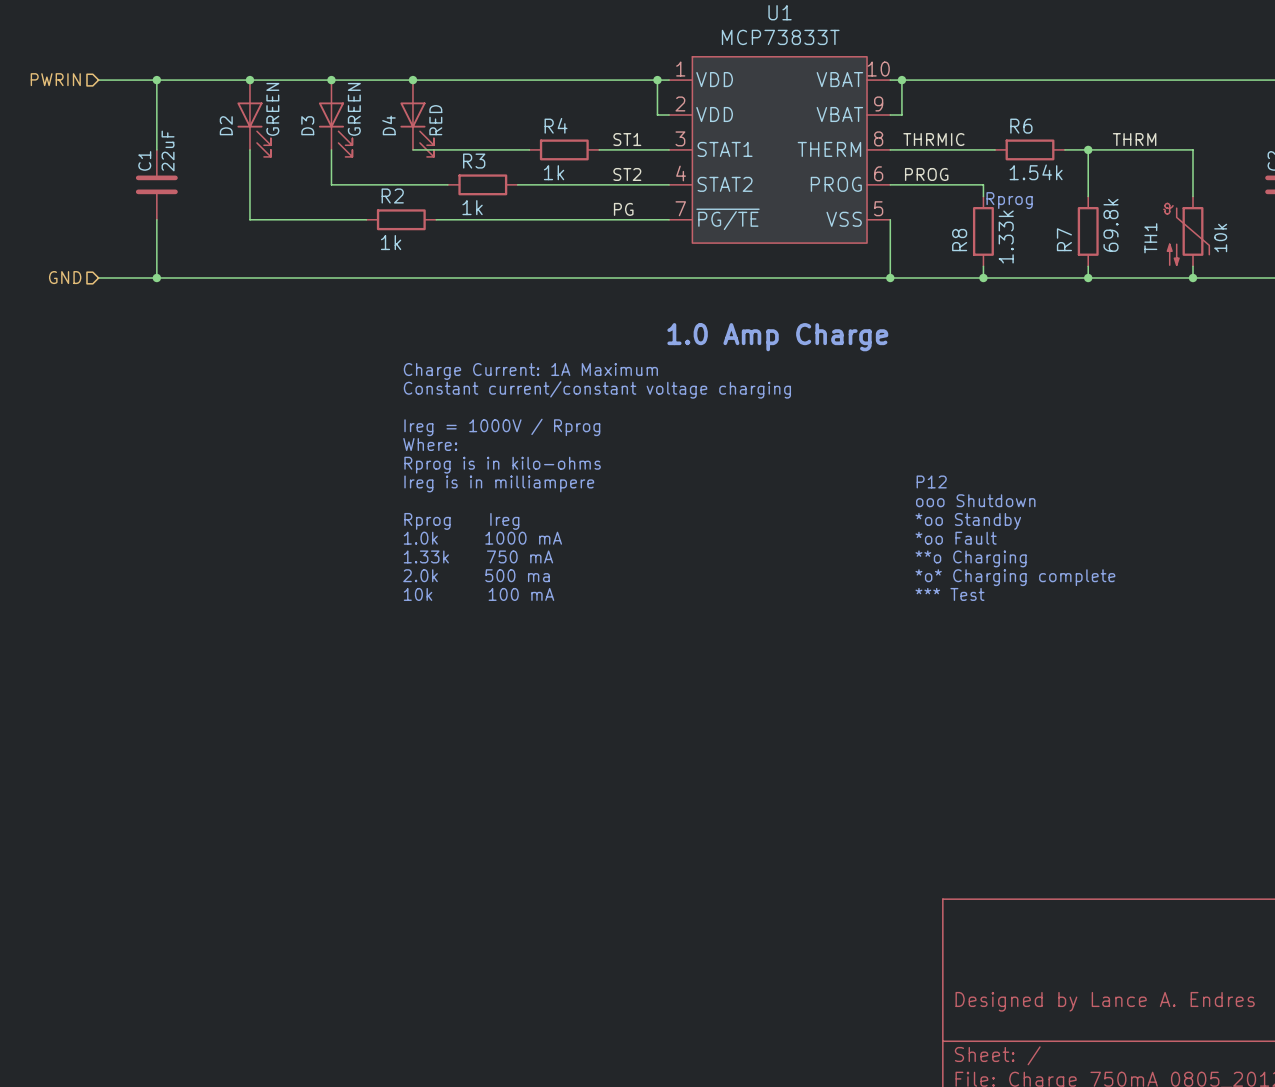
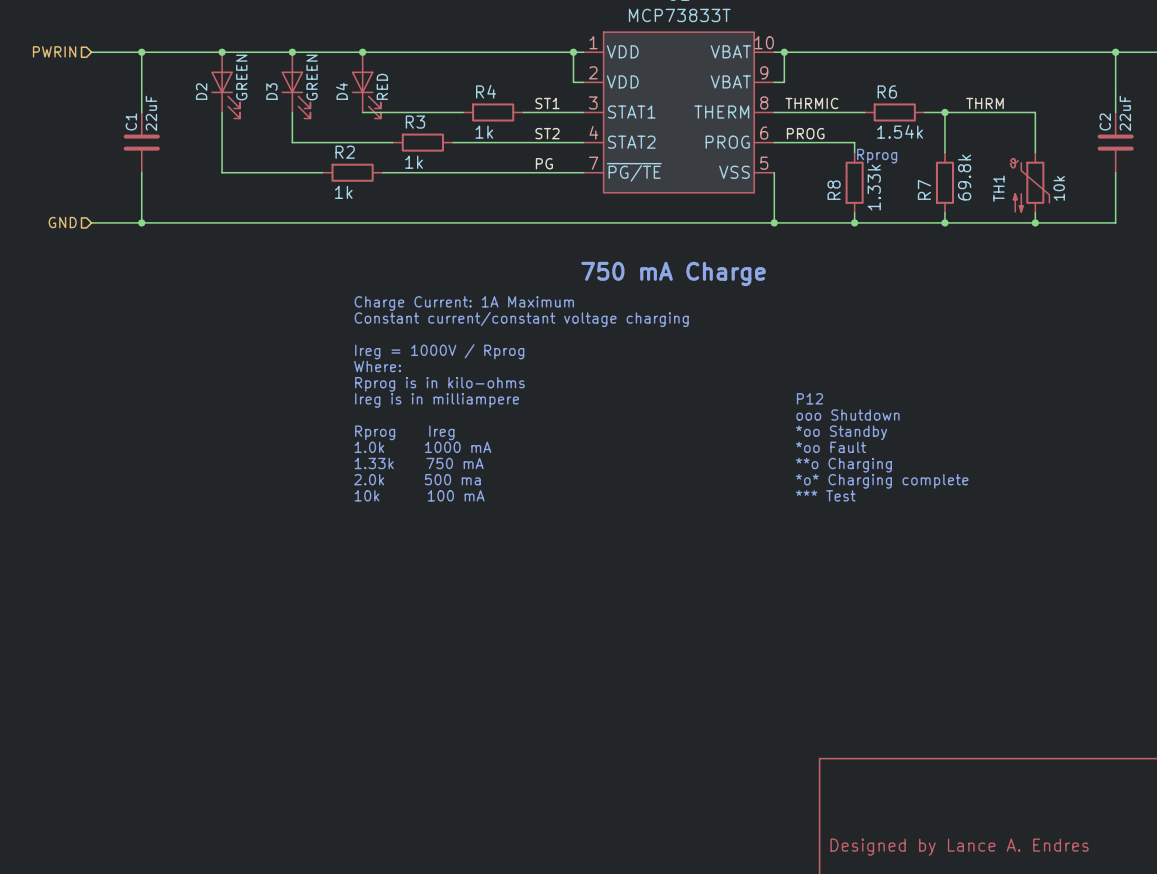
text: 1.0 Amp Charge (777, 337) -> 750 mA Charge (673, 273)

